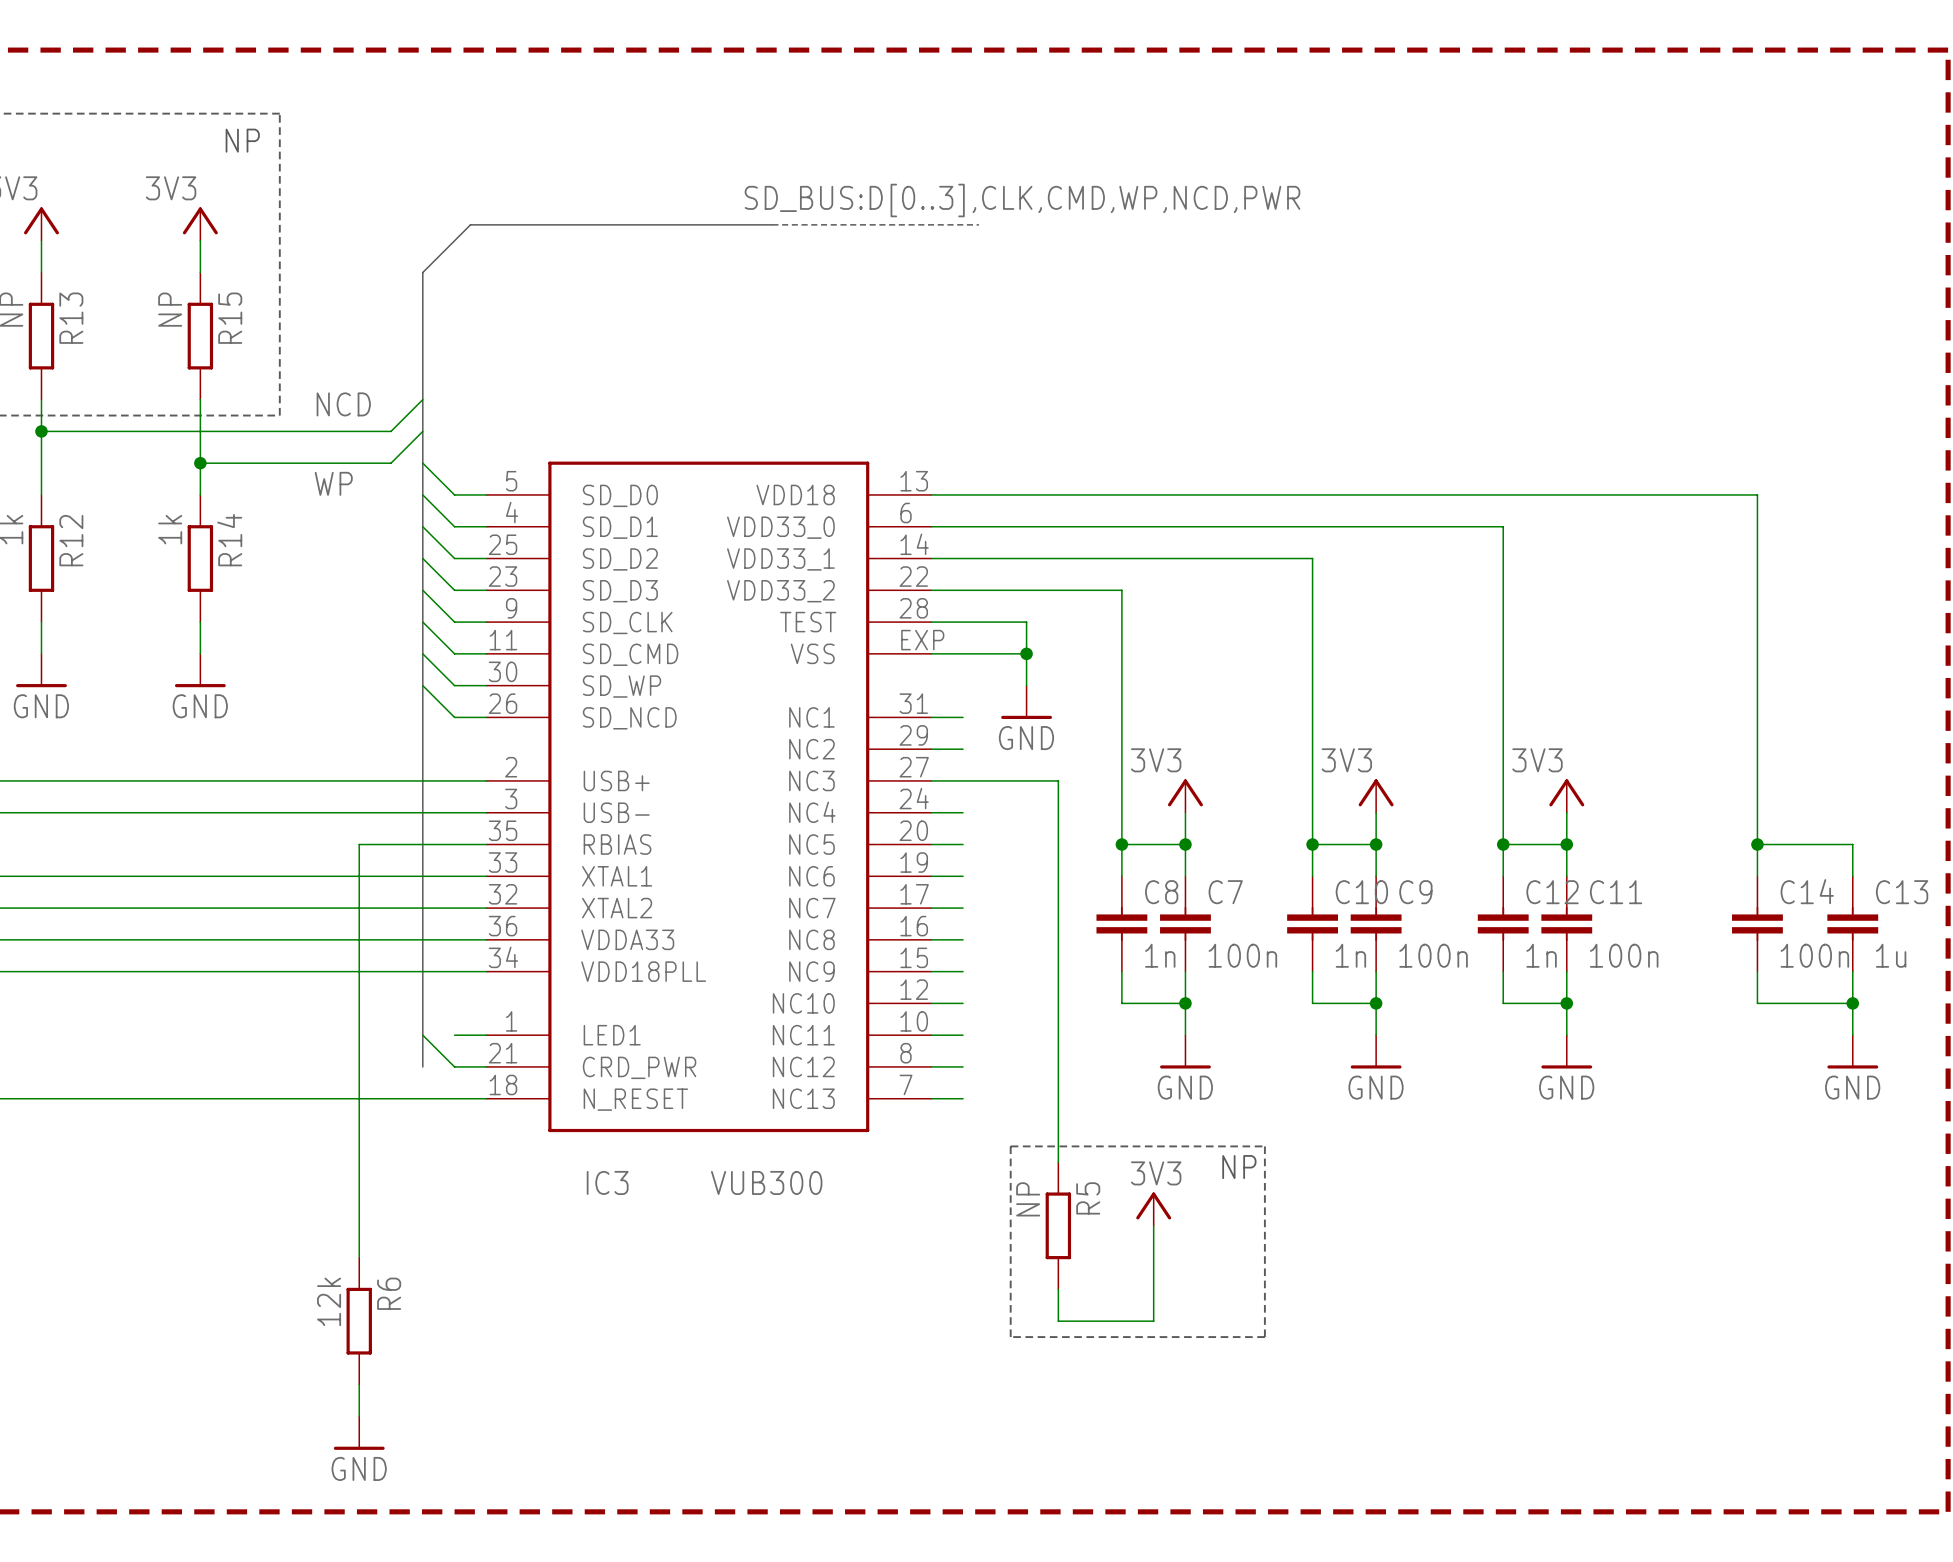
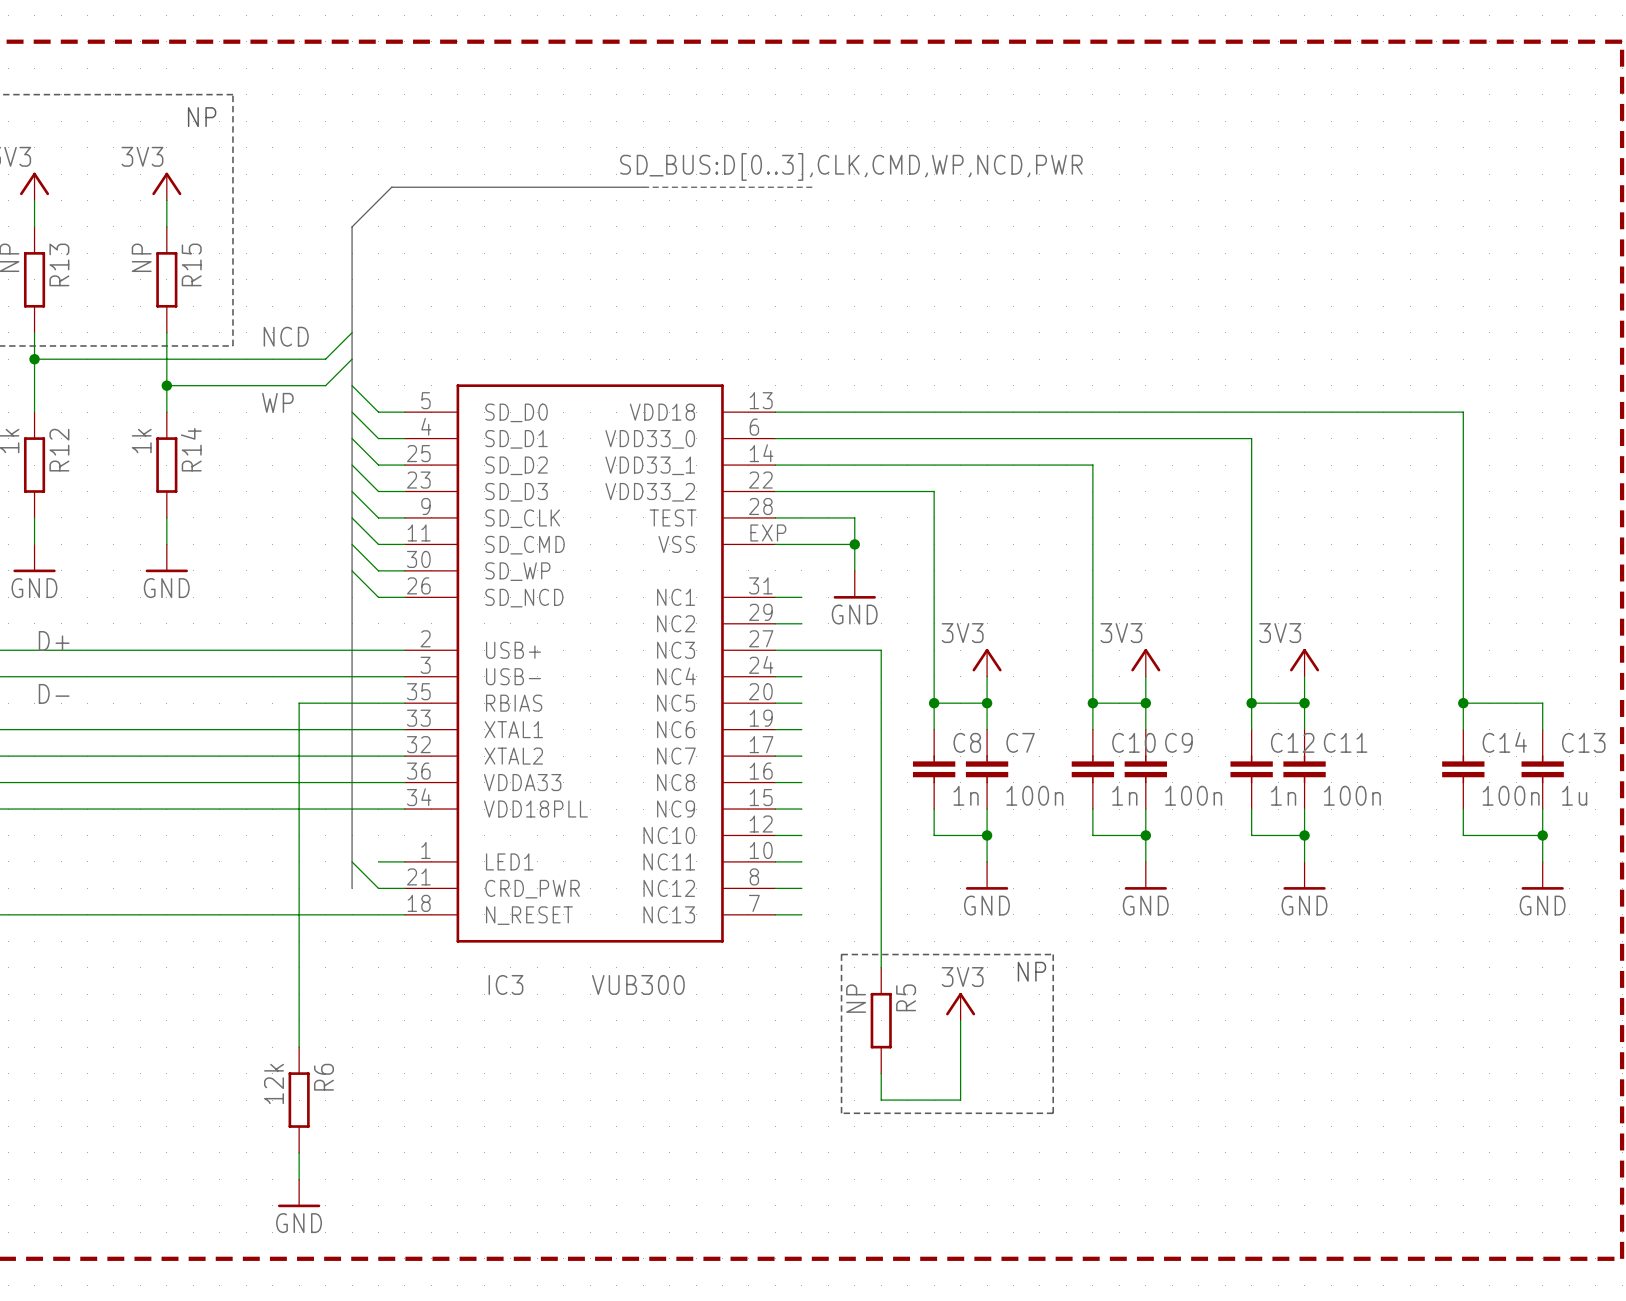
label: none -> D+ (54, 641)
label: none -> D- (54, 693)

